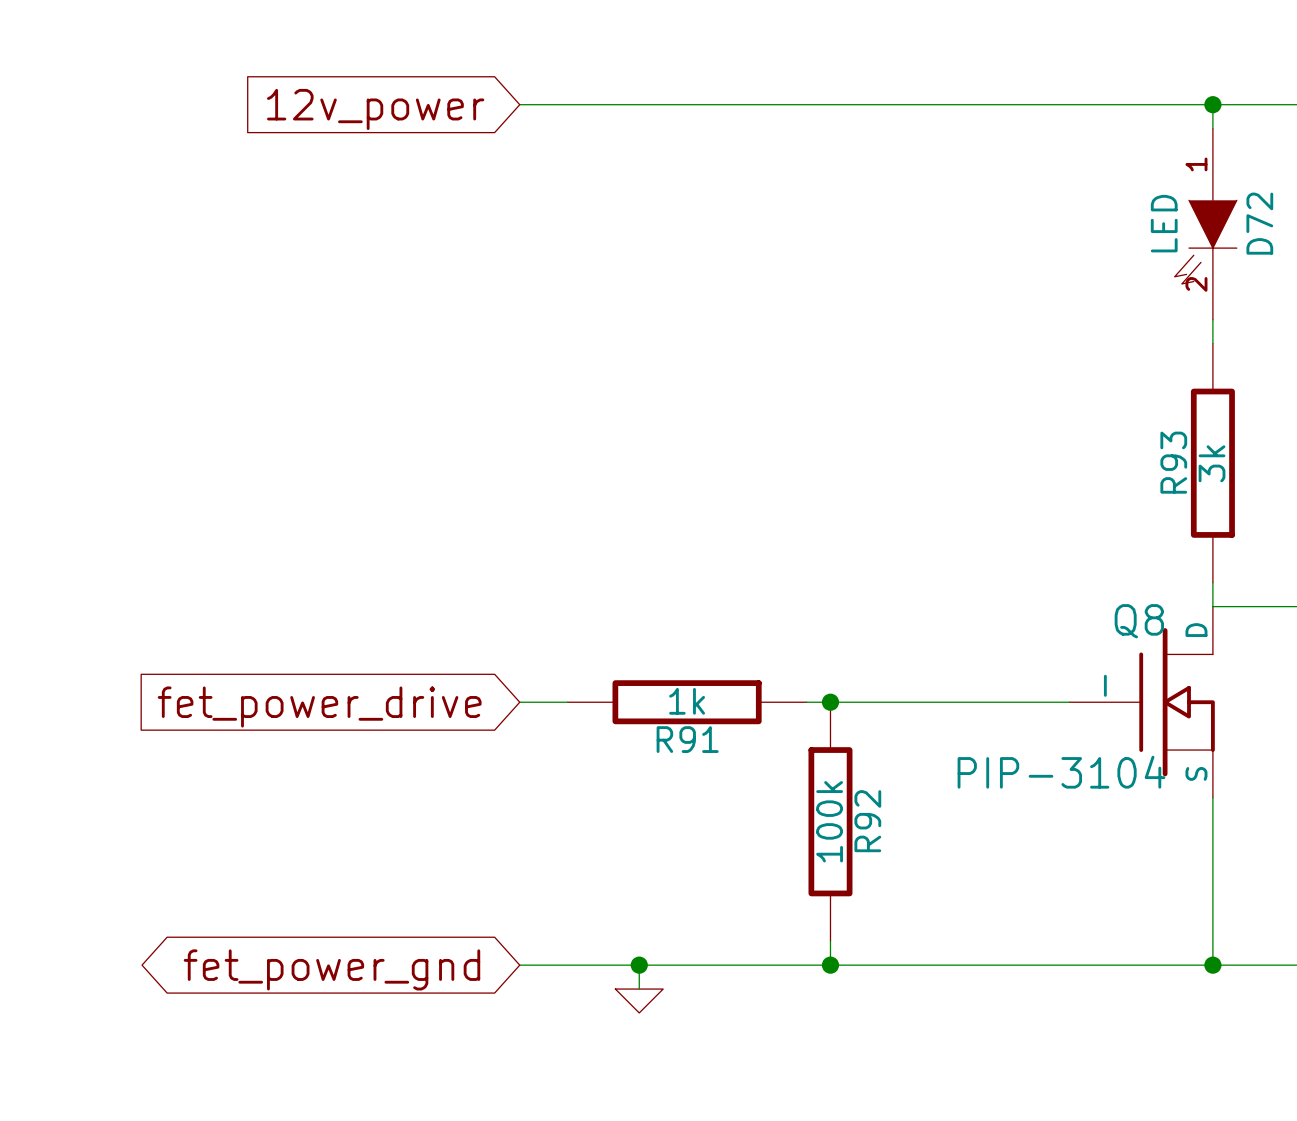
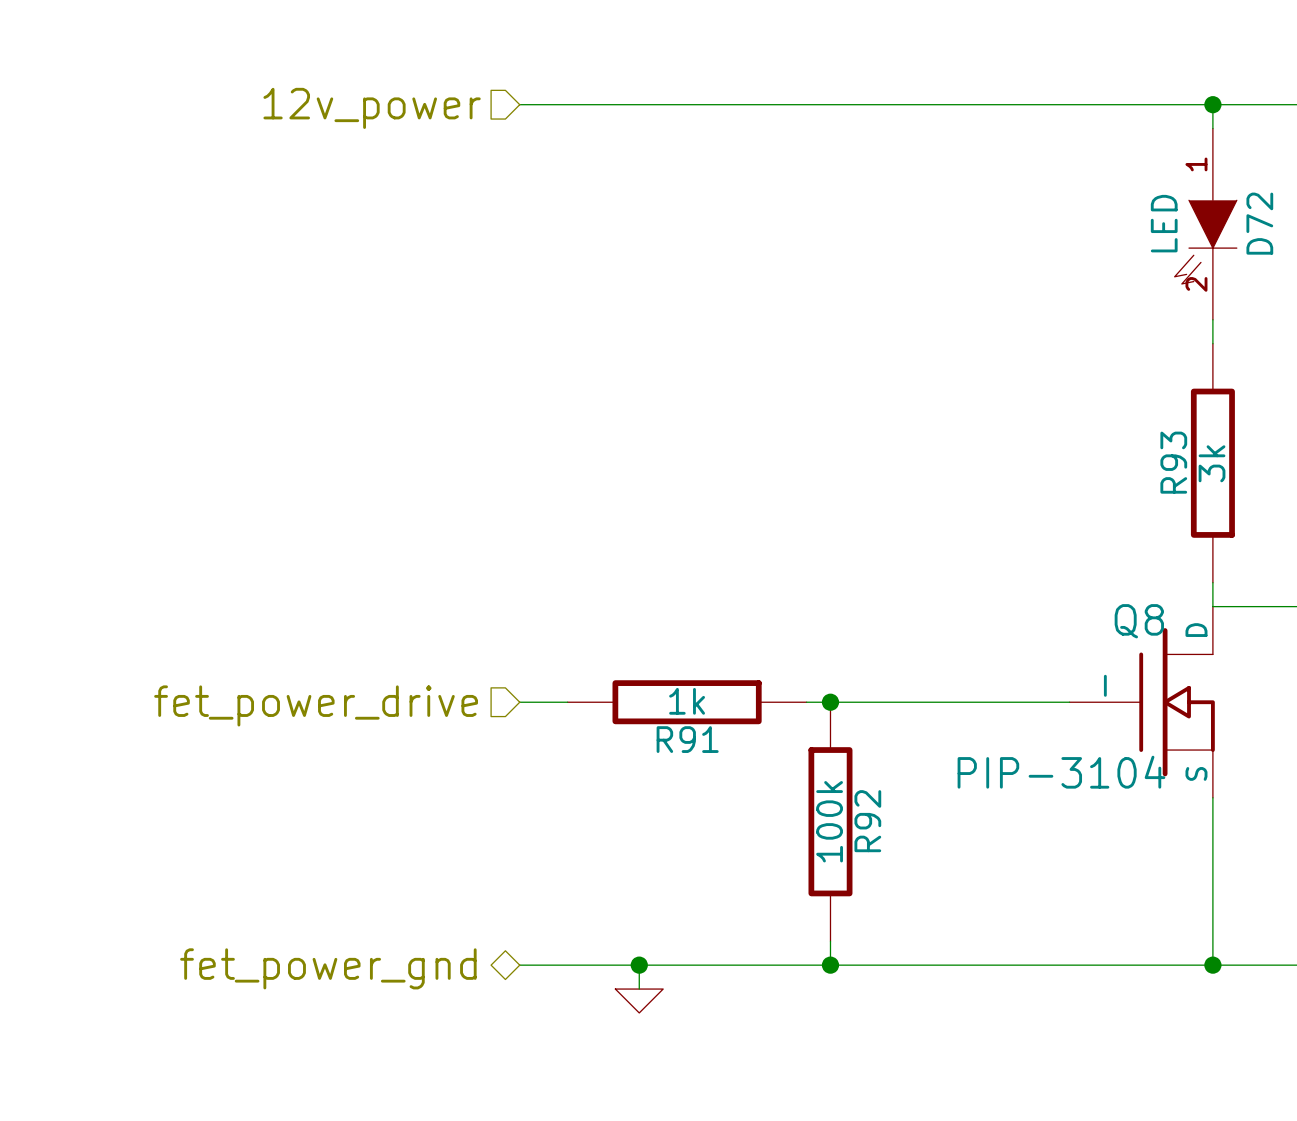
hierarchical label: none -> 12v_power (372, 108)
global label: 12v_power (375, 109) -> none
hierarchical label: none -> fet_power_drive (316, 705)
global label: fet_power_drive (319, 707) -> none
hierarchical label: none -> fet_power_gnd (328, 968)
global label: fet_power_gnd (331, 969) -> none

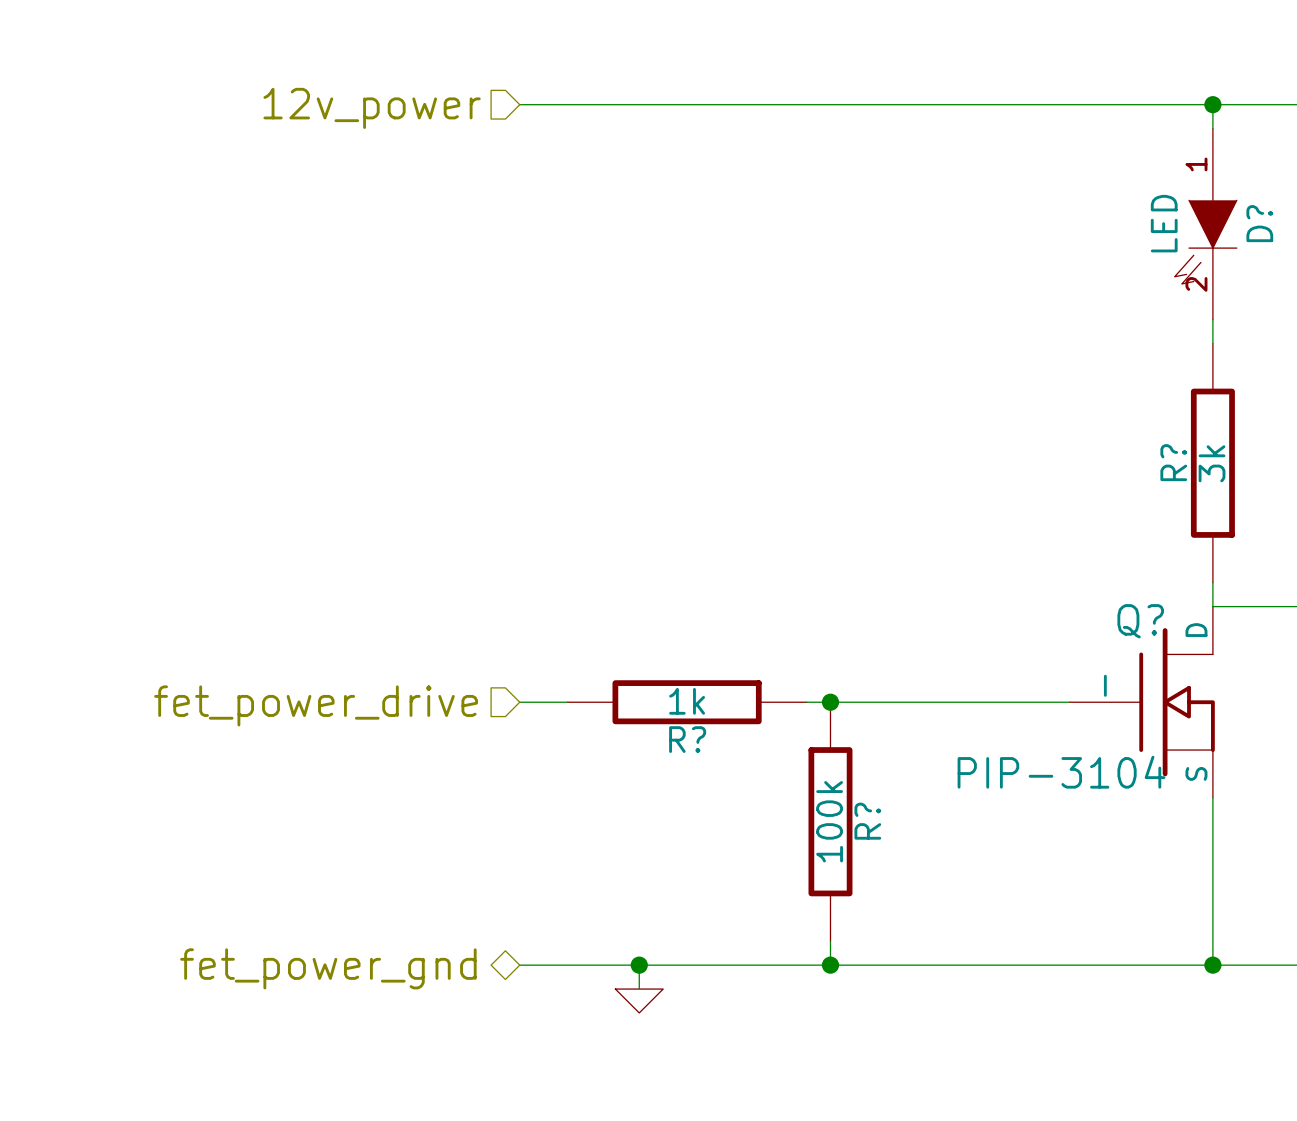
D72 name: D72 (1259, 223) -> D? (1259, 223)
R93 name: R93 (1173, 462) -> R? (1173, 462)
Q8 name: Q8 (1139, 621) -> Q? (1140, 621)
R91 name: R91 (687, 739) -> R? (687, 739)
R92 name: R92 (867, 821) -> R? (867, 821)

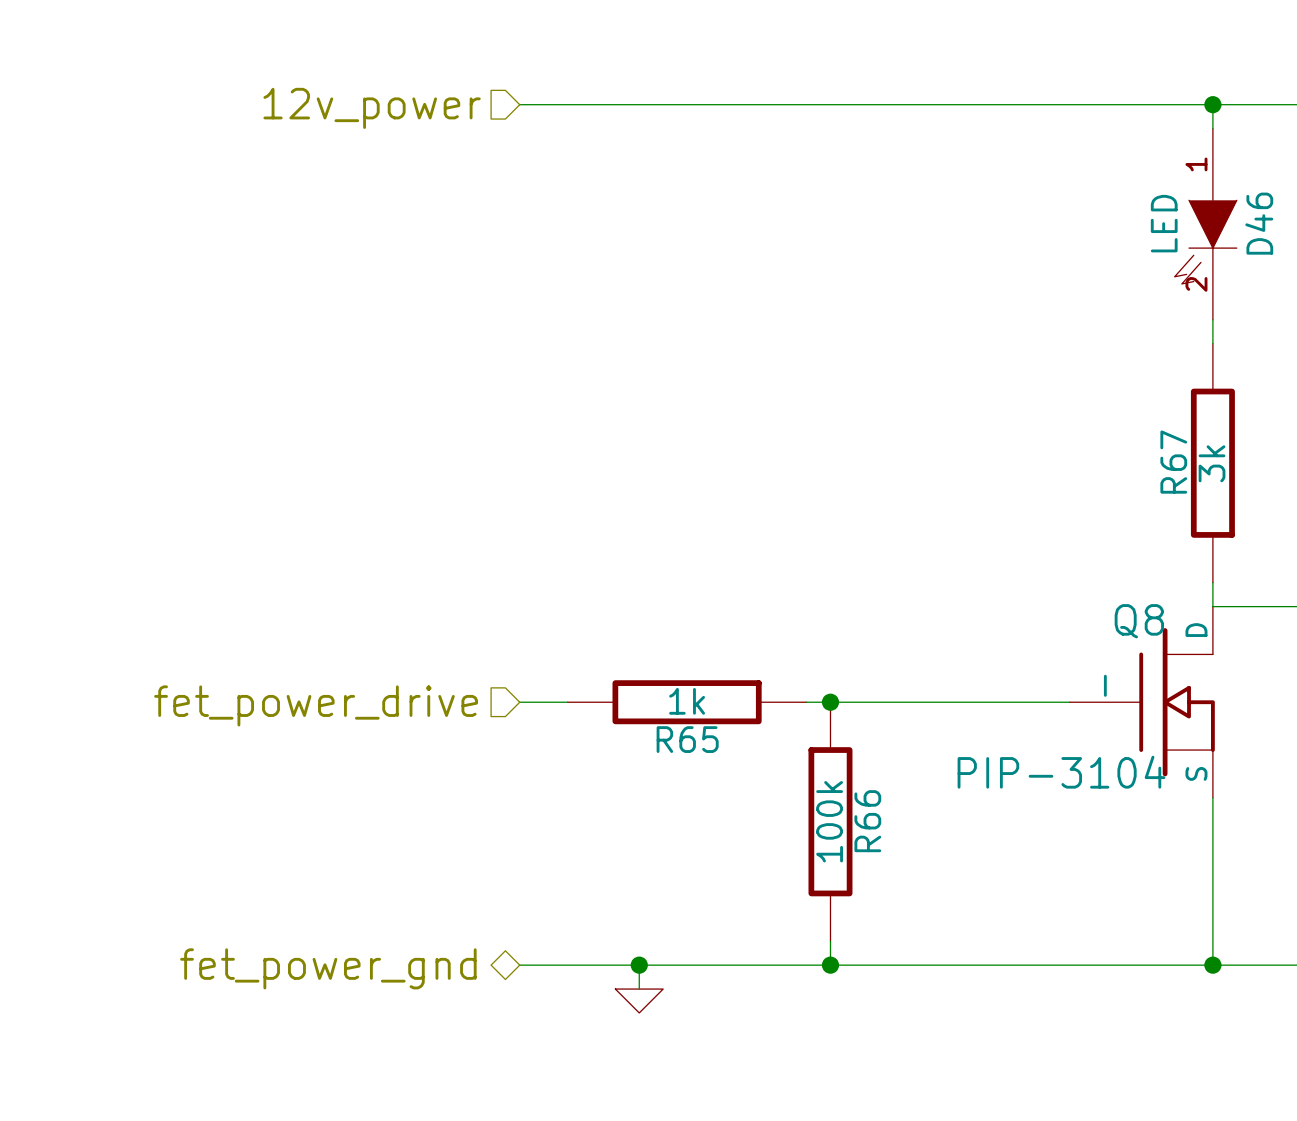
D? name: D? (1259, 223) -> D46 (1259, 223)
R? name: R? (1173, 462) -> R67 (1173, 462)
Q? name: Q? (1140, 621) -> Q8 (1139, 621)
R? name: R? (687, 739) -> R65 (687, 739)
R? name: R? (867, 821) -> R66 (867, 821)

